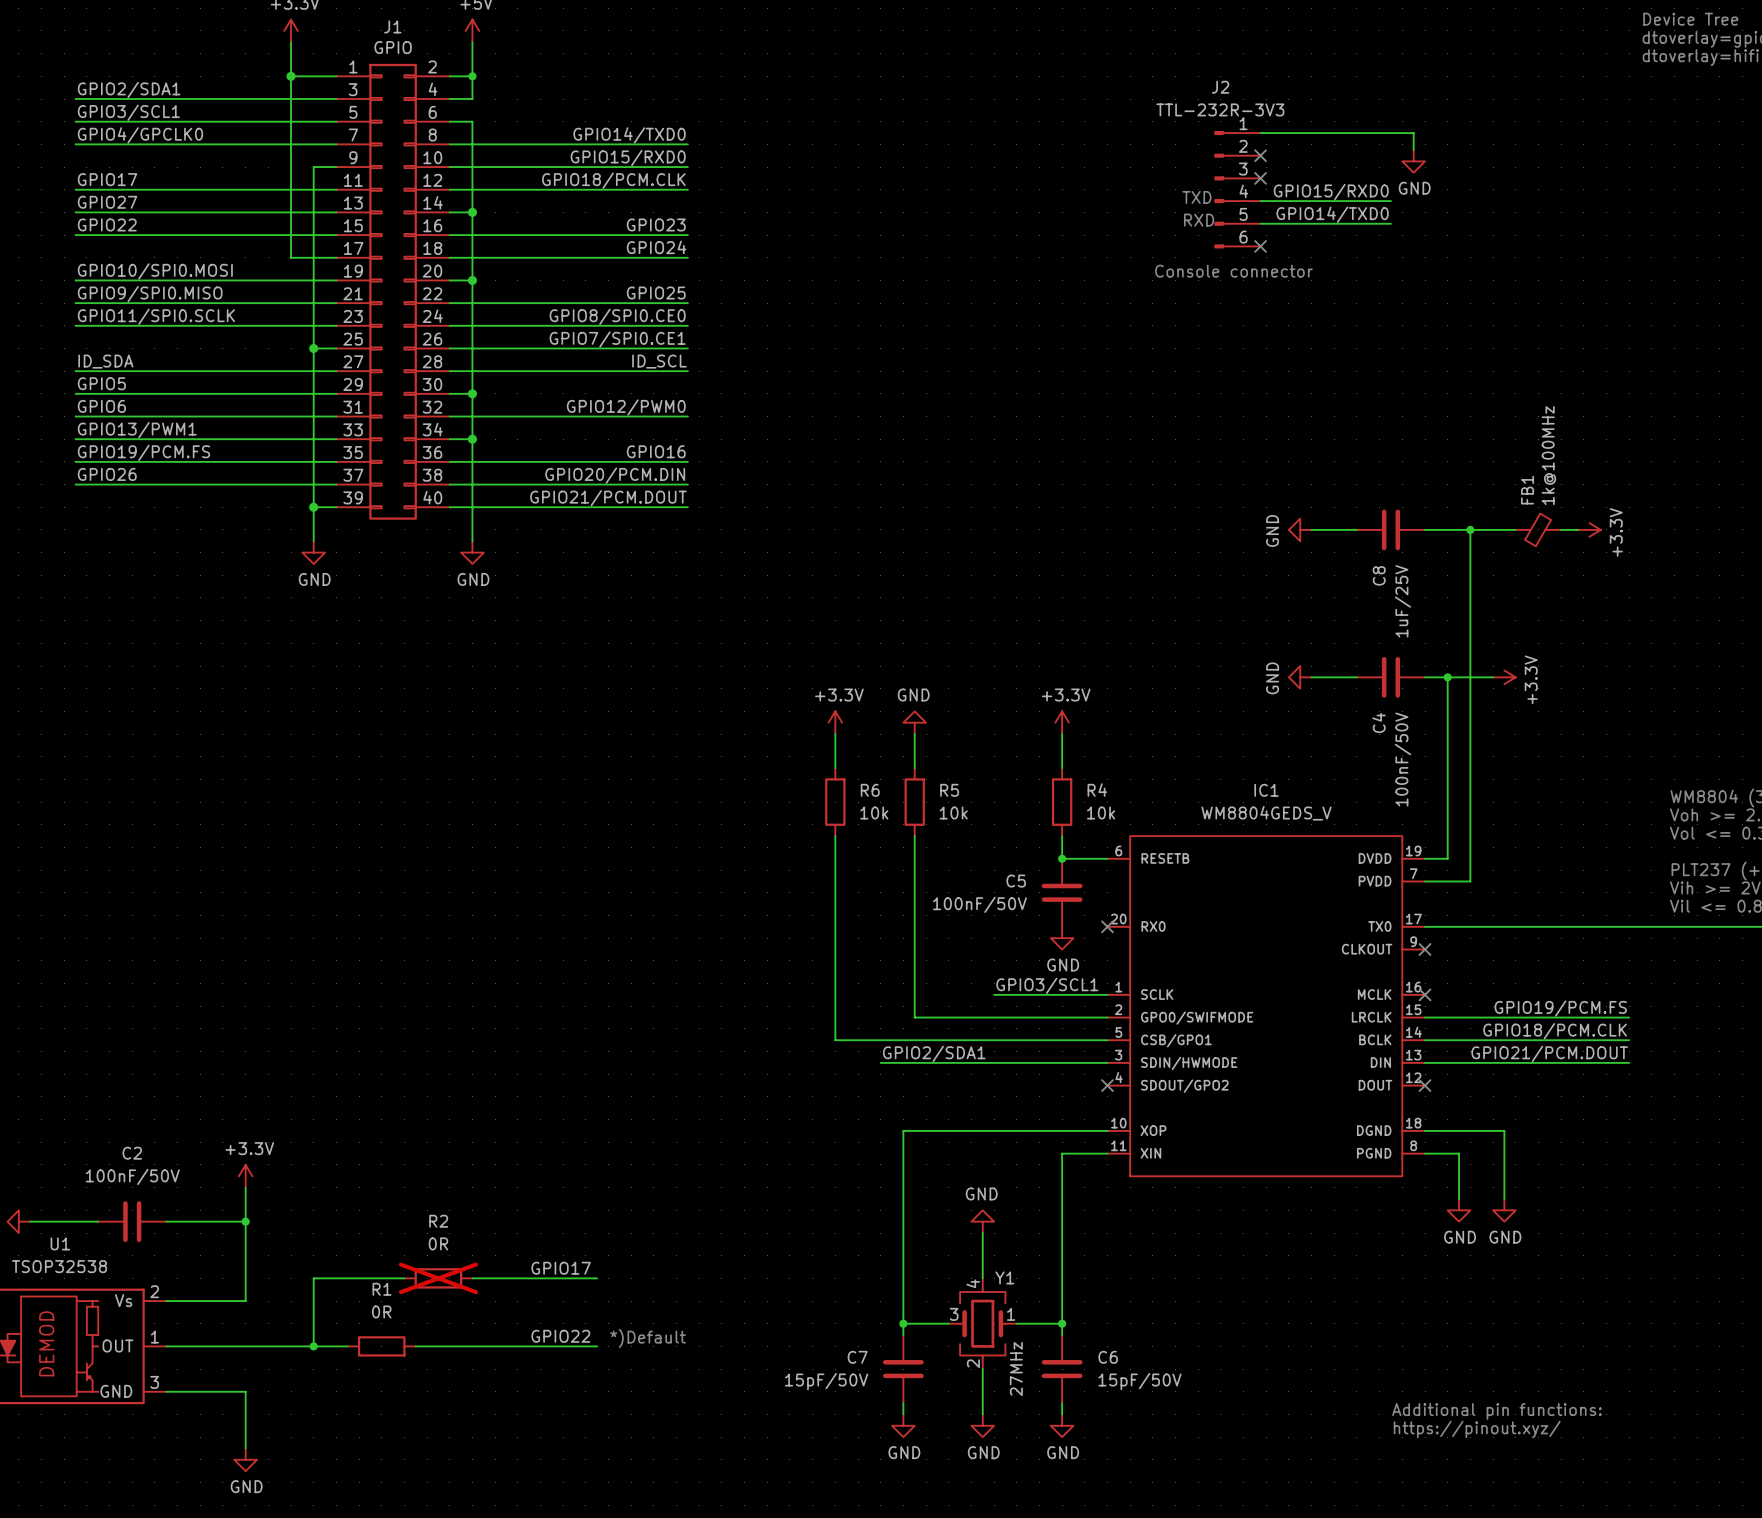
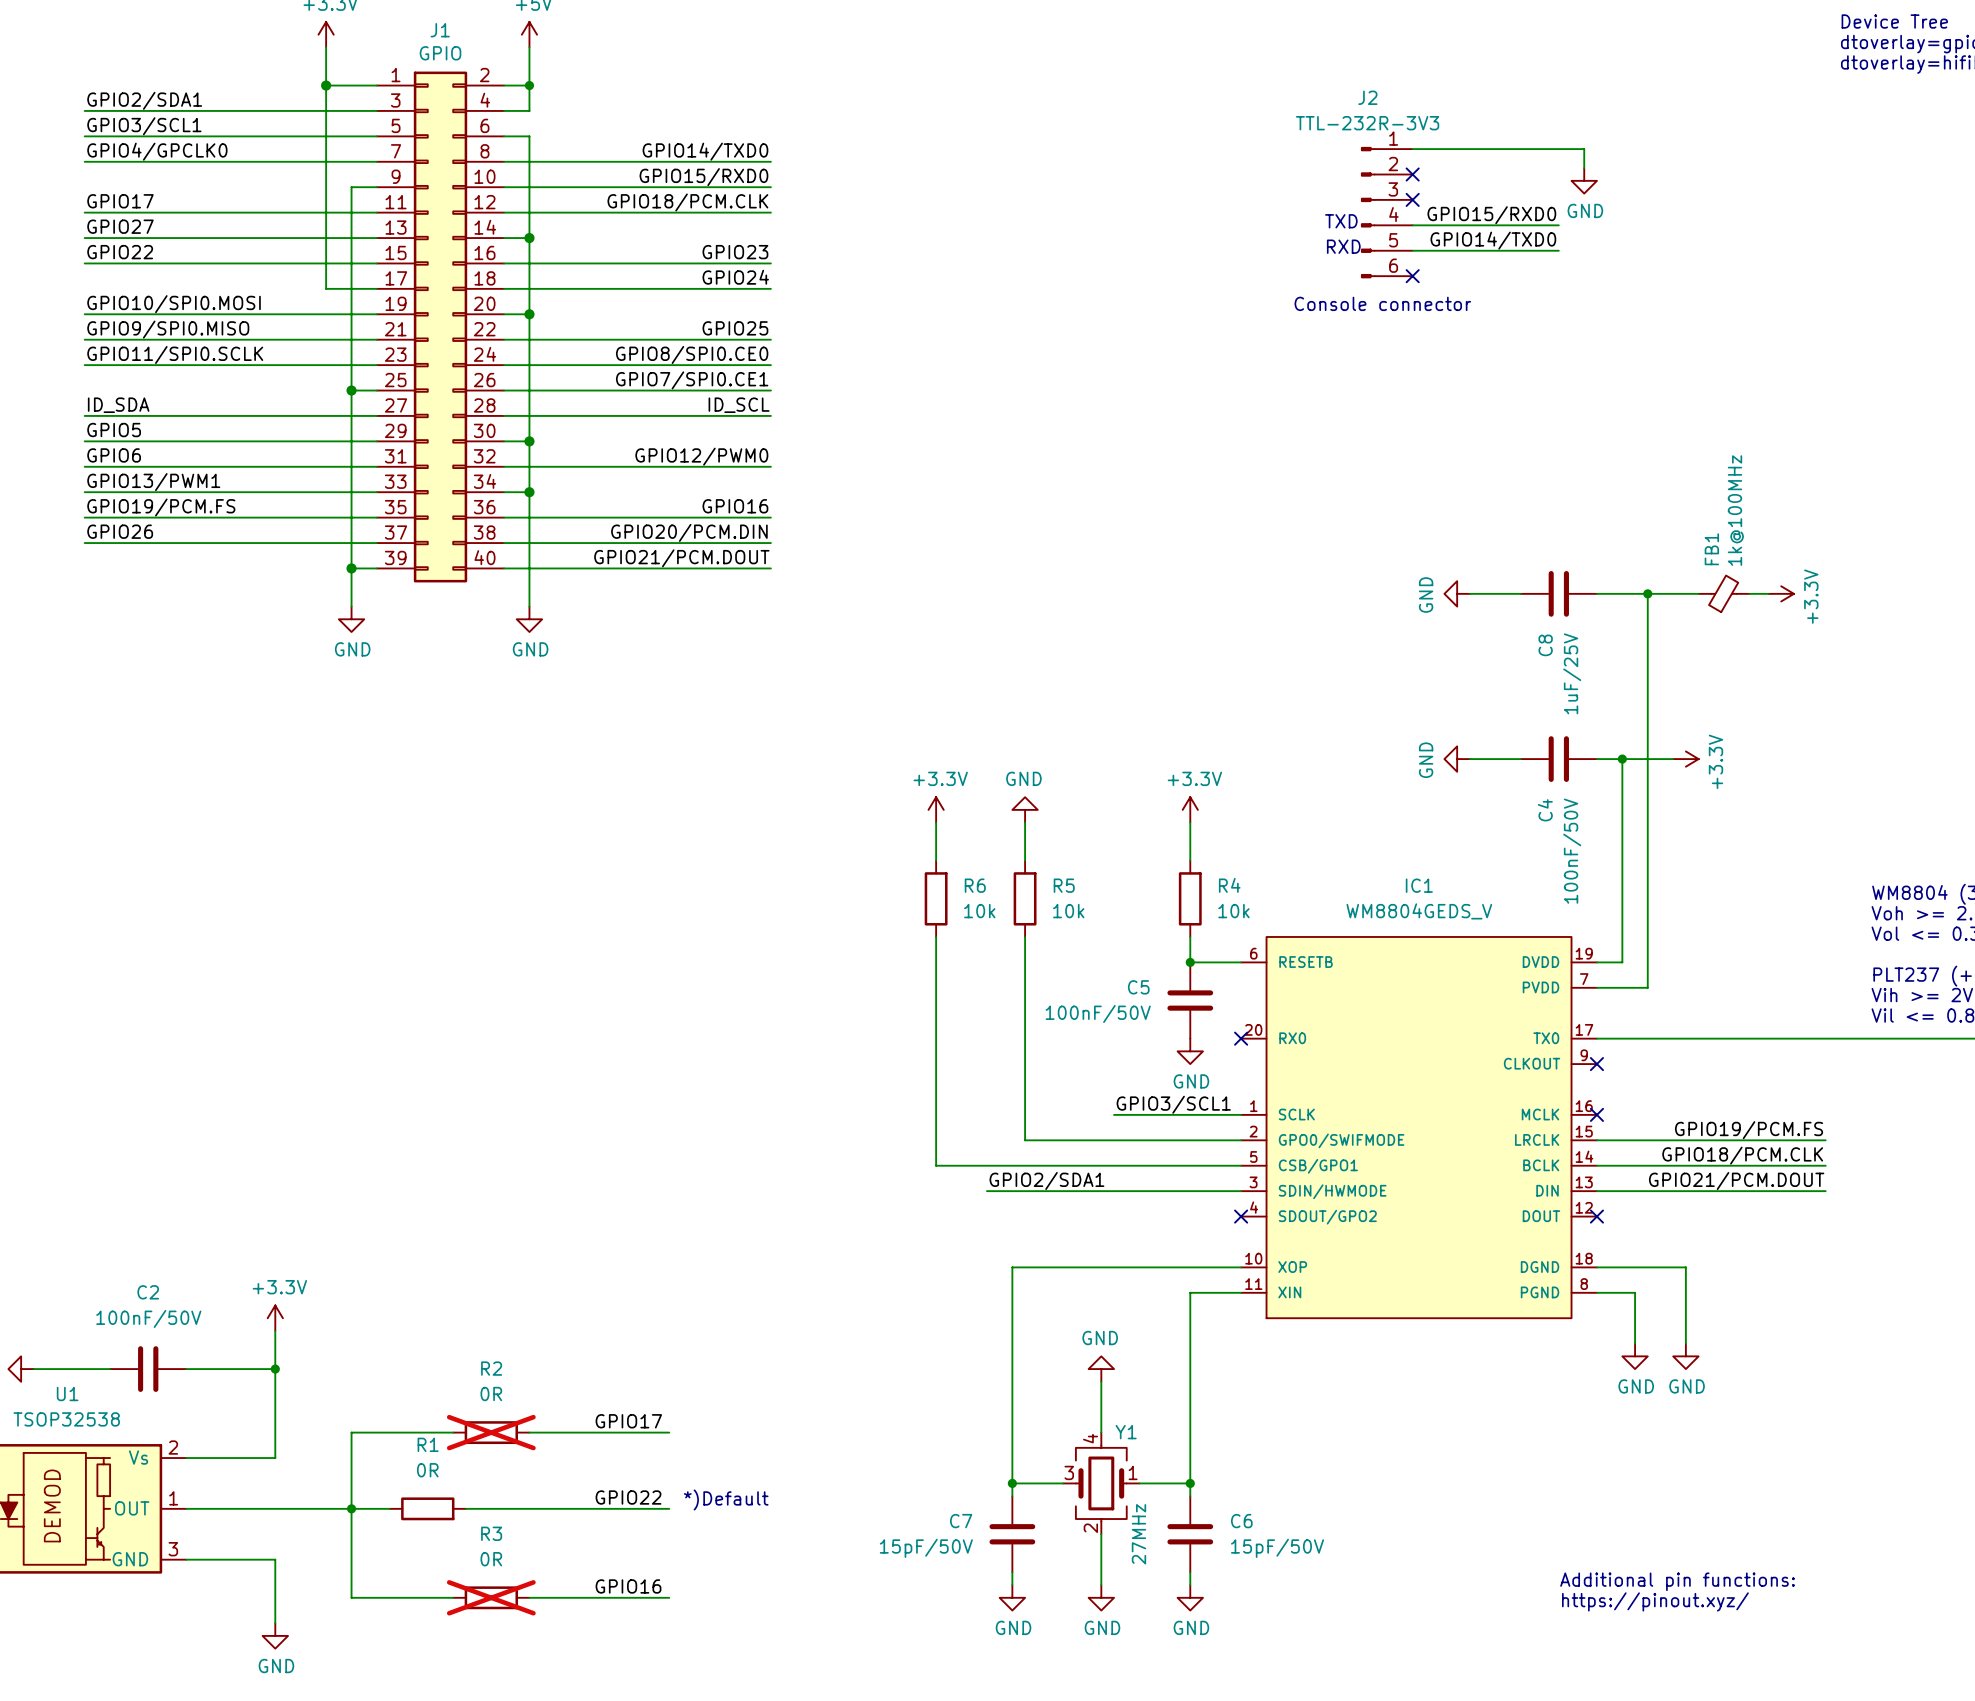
wire: none -> (351, 1508) (351, 1597) (453, 1597)
label: none -> GPIO16 (628, 1586)
R3: none -> 0R (491, 1597)
wire: none -> (529, 1597) (669, 1597)

